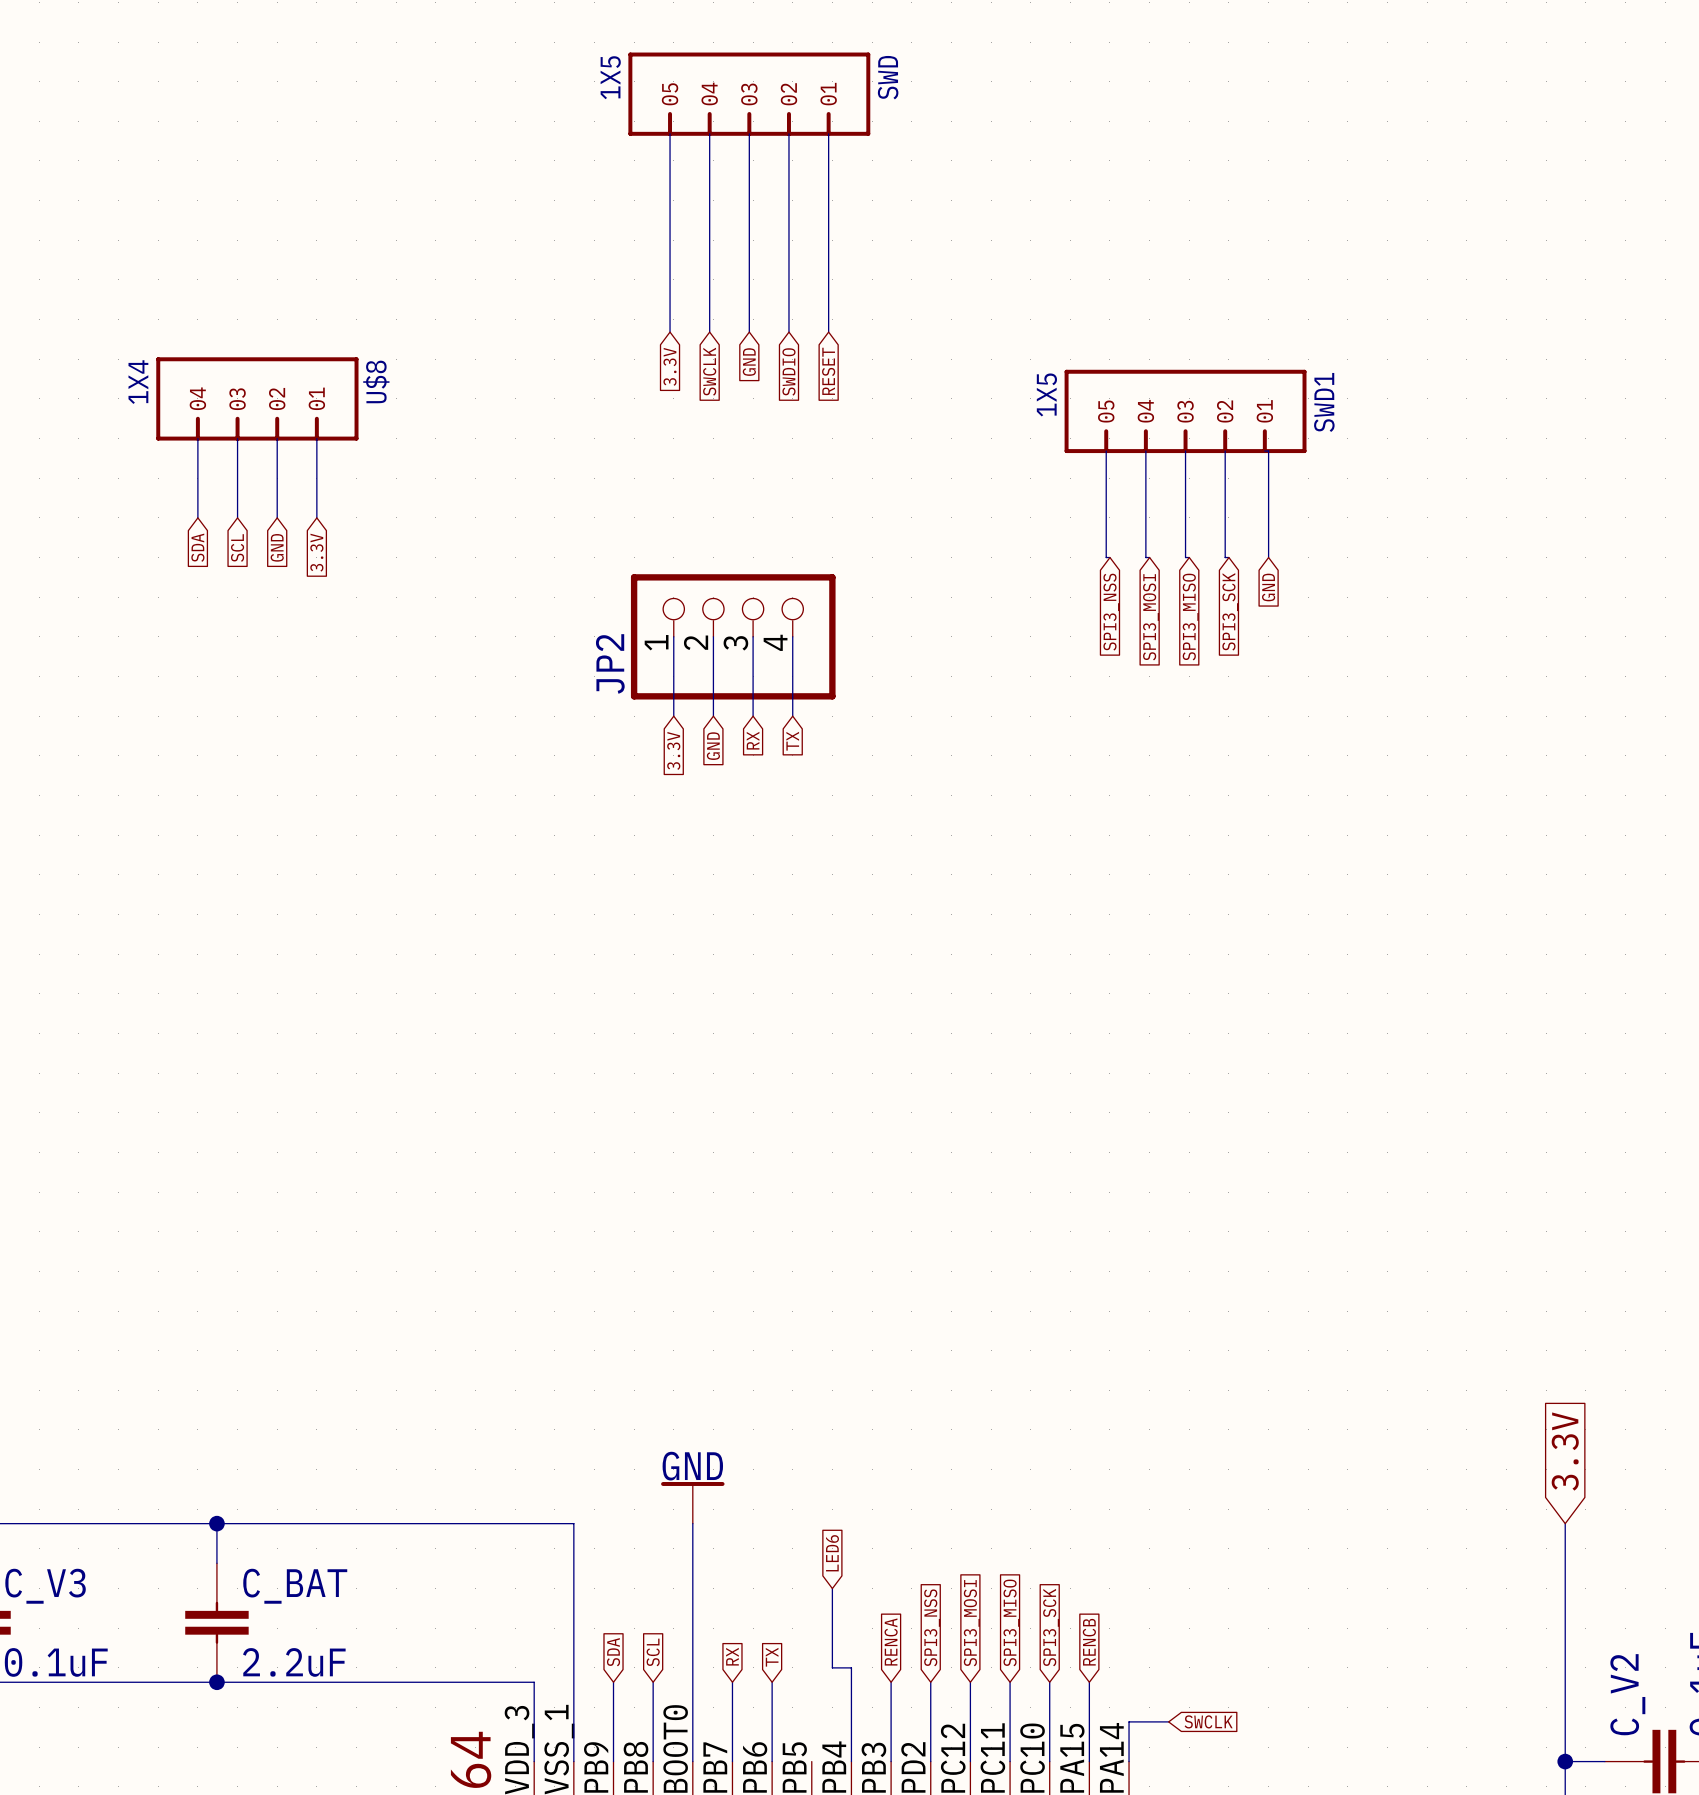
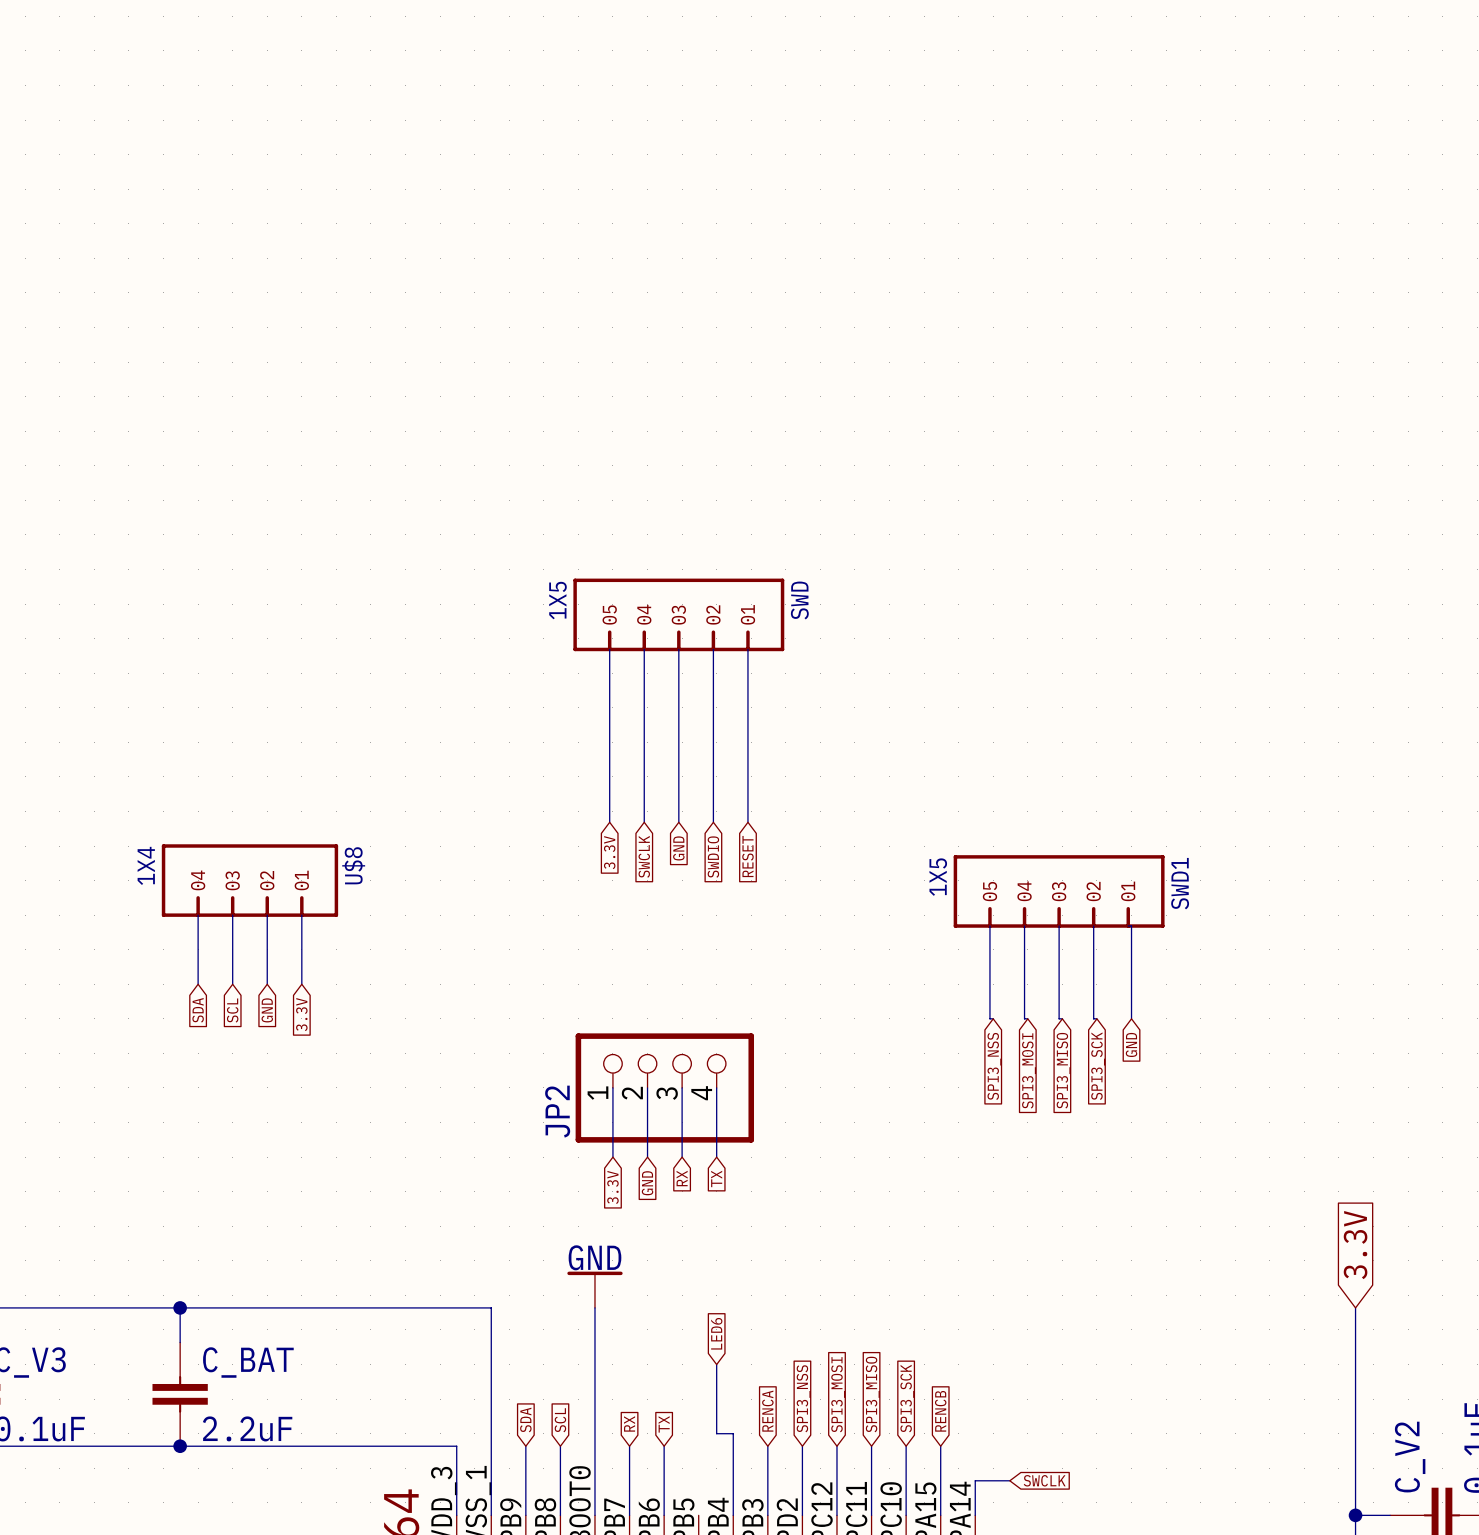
SWD: 1X5 (749, 94) -> none
wire: (670, 133) (670, 332) -> none
wire: (709, 133) (709, 332) -> none
wire: (749, 133) (749, 332) -> none
wire: (788, 133) (788, 332) -> none
wire: (828, 133) (828, 332) -> none
global label: GND (749, 362) -> none
global label: 3.3V (670, 366) -> none
global label: SWCLK (709, 371) -> none
global label: SWDIO (788, 371) -> none
global label: RESET (828, 371) -> none
U$8 position: (257, 398) -> (249, 880)
SWD1 position: (1185, 411) -> (1059, 891)
wire: (197, 438) (197, 517) -> none
wire: (237, 438) (237, 517) -> none
wire: (277, 438) (277, 517) -> none
wire: (316, 438) (316, 517) -> none
wire: (1106, 451) (1106, 557) (1109, 557) -> none
wire: (1145, 451) (1145, 557) (1149, 557) -> none
wire: (1185, 451) (1185, 557) (1189, 557) -> none
wire: (1225, 451) (1225, 557) (1228, 557) -> none
wire: (1264, 451) (1268, 451) (1268, 557) -> none
global label: SDA (197, 547) -> none
global label: GND (277, 547) -> none
global label: SCL (237, 548) -> none
global label: 3.3V (316, 552) -> none
global label: GND (1268, 587) -> none
global label: SPI3_SCK (1230, 611) -> none
global label: SPI3_NSS (1111, 612) -> none
global label: SPI3_MOSI (1151, 617) -> none
global label: SPI3_MISO (1190, 617) -> none
wire: (673, 636) (673, 716) -> none
wire: (713, 636) (713, 716) -> none
JP2 position: (733, 636) -> (664, 1087)
wire: (753, 636) (753, 716) -> none
wire: (792, 636) (792, 716) -> none
SWD: none -> 1X5 (678, 614)
global label: RX (753, 740) -> none
global label: TX (792, 741) -> none
global label position: GND (713, 746) -> GND (678, 848)
global label position: 3.3V (673, 750) -> 3.3V (609, 852)
wire: none -> (609, 649) (609, 822)
wire: none -> (644, 649) (644, 822)
wire: none -> (678, 649) (678, 822)
wire: none -> (713, 649) (713, 822)
wire: none -> (747, 649) (747, 822)
global label: none -> RESET (747, 856)
global label: none -> SWCLK (644, 856)
global label: none -> SWDIO (713, 857)
wire: none -> (198, 915) (198, 984)
wire: none -> (232, 915) (232, 984)
wire: none -> (267, 915) (267, 984)
wire: none -> (301, 915) (301, 984)
wire: none -> (989, 926) (989, 1018) (993, 1018)
wire: none -> (1024, 926) (1024, 1018) (1027, 1018)
wire: none -> (1059, 926) (1059, 1018) (1062, 1018)
wire: none -> (1093, 926) (1093, 1018) (1096, 1018)
wire: none -> (1128, 926) (1131, 926) (1131, 1018)
global label: none -> SDA (198, 1010)
global label: none -> SCL (232, 1010)
global label: none -> GND (267, 1010)
global label: none -> 3.3V (301, 1014)
global label: none -> GND (1131, 1044)
global label: none -> SPI3_NSS (994, 1066)
global label: none -> SPI3_SCK (1098, 1066)
global label: none -> SPI3_MOSI (1029, 1070)
global label: none -> SPI3_MISO (1063, 1070)
wire: none -> (612, 1087) (612, 1157)
wire: none -> (647, 1087) (647, 1157)
wire: none -> (682, 1087) (682, 1157)
wire: none -> (716, 1087) (716, 1157)
global label: none -> RX (682, 1178)
global label: none -> TX (716, 1178)
global label: none -> GND (647, 1183)
global label: none -> 3.3V (612, 1187)

